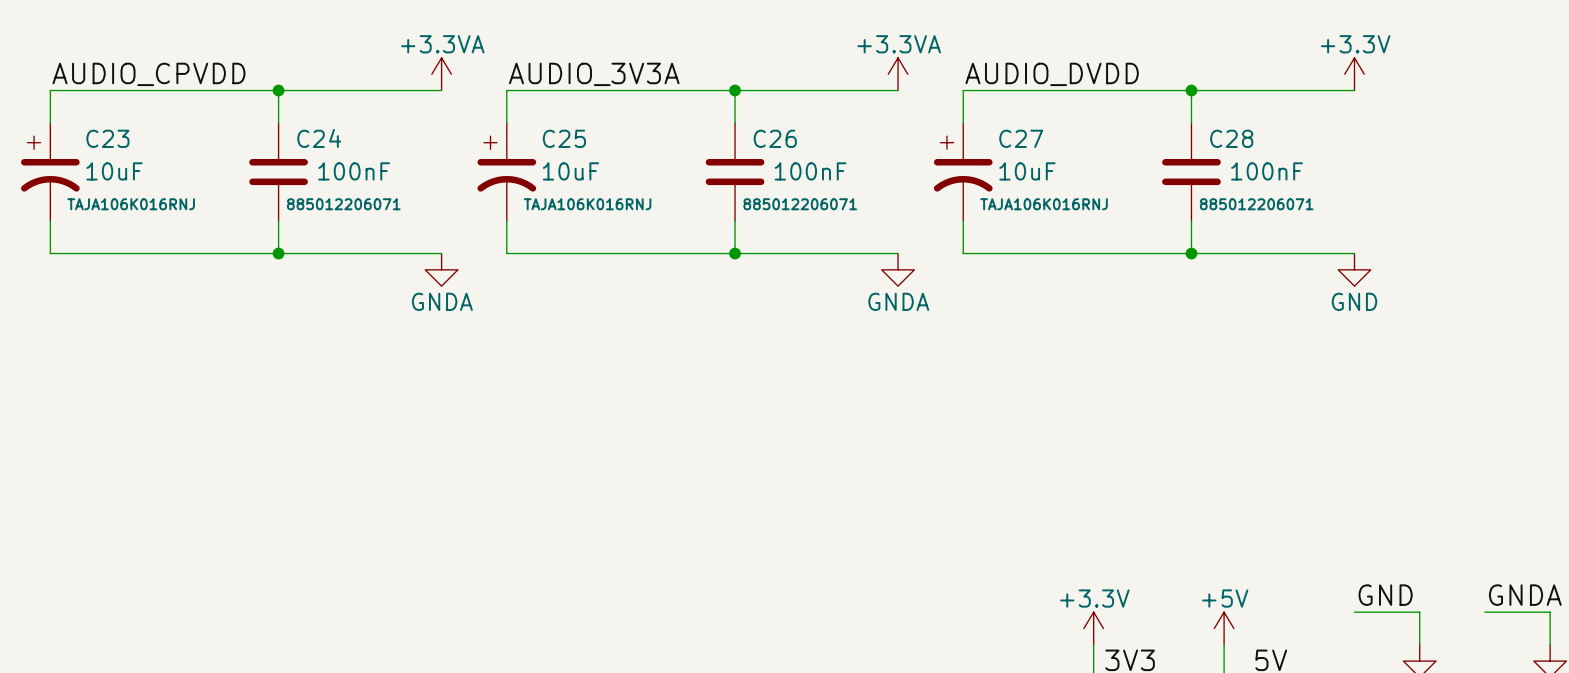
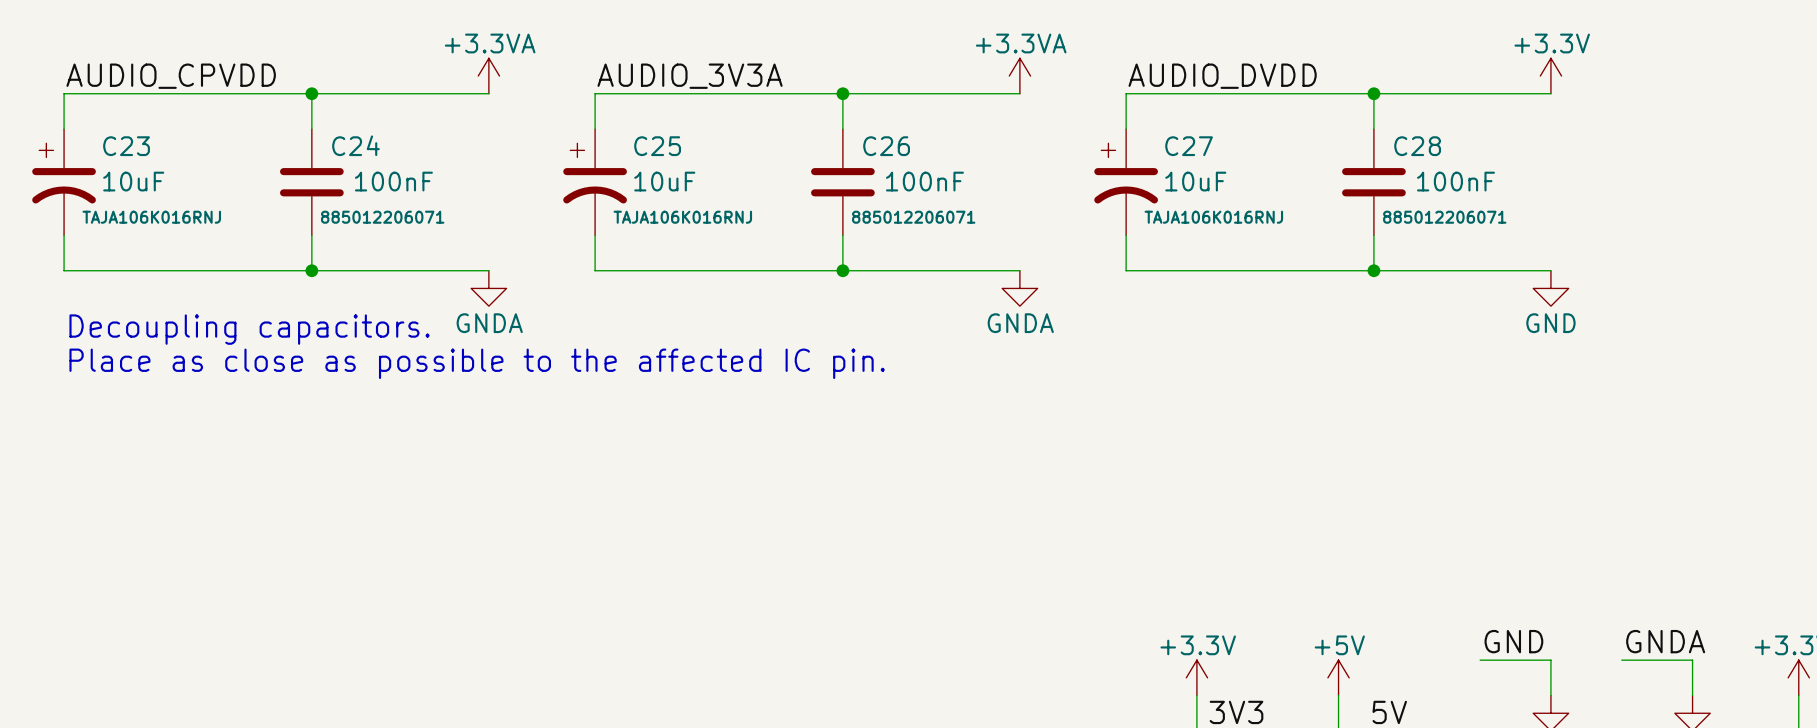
label position: AUDIO_3V3A (594, 74) -> AUDIO_3V3A (690, 76)
power symbol position: +3.3VA (898, 74) -> +3.3VA (1019, 76)
label position: AUDIO_DVDD (1052, 74) -> AUDIO_DVDD (1222, 76)
power symbol position: +3.3V (1354, 74) -> +3.3V (1550, 76)
wire: (539, 90) (506, 90) (506, 123) -> (595, 93) (595, 129)
wire: (735, 90) (735, 123) -> (842, 93) (842, 129)
junction position: (735, 90) -> (842, 93)
wire: none -> (984, 93) (1019, 93)
wire: (1028, 90) (963, 90) (963, 123) -> (1126, 93) (1126, 129)
wire: (1191, 90) (1191, 123) -> (1373, 93) (1373, 129)
junction position: (1191, 90) -> (1373, 93)
wire: none -> (1480, 93) (1550, 93)
C25 position: (506, 172) -> (595, 182)
C26 position: (735, 172) -> (842, 182)
C27 position: (963, 172) -> (1126, 182)
C28 position: (1191, 172) -> (1373, 182)
wire: (506, 220) (506, 253) (539, 253) -> (595, 235) (595, 270)
wire: (735, 220) (735, 253) -> (842, 235) (842, 270)
wire: (963, 220) (963, 253) (1028, 253) -> (1126, 235) (1126, 270)
wire: (1191, 220) (1191, 253) -> (1373, 235) (1373, 270)
junction position: (735, 253) -> (842, 270)
wire: none -> (984, 270) (1019, 270)
junction position: (1191, 253) -> (1373, 270)
wire: none -> (1480, 270) (1550, 270)
power symbol position: GNDA (898, 269) -> GNDA (1019, 288)
power symbol position: GND (1354, 269) -> GND (1550, 288)
text: none -> Decoupling capacitors. (249, 329)
text: none -> Place as close as possible to the affected IC pin. (477, 363)

